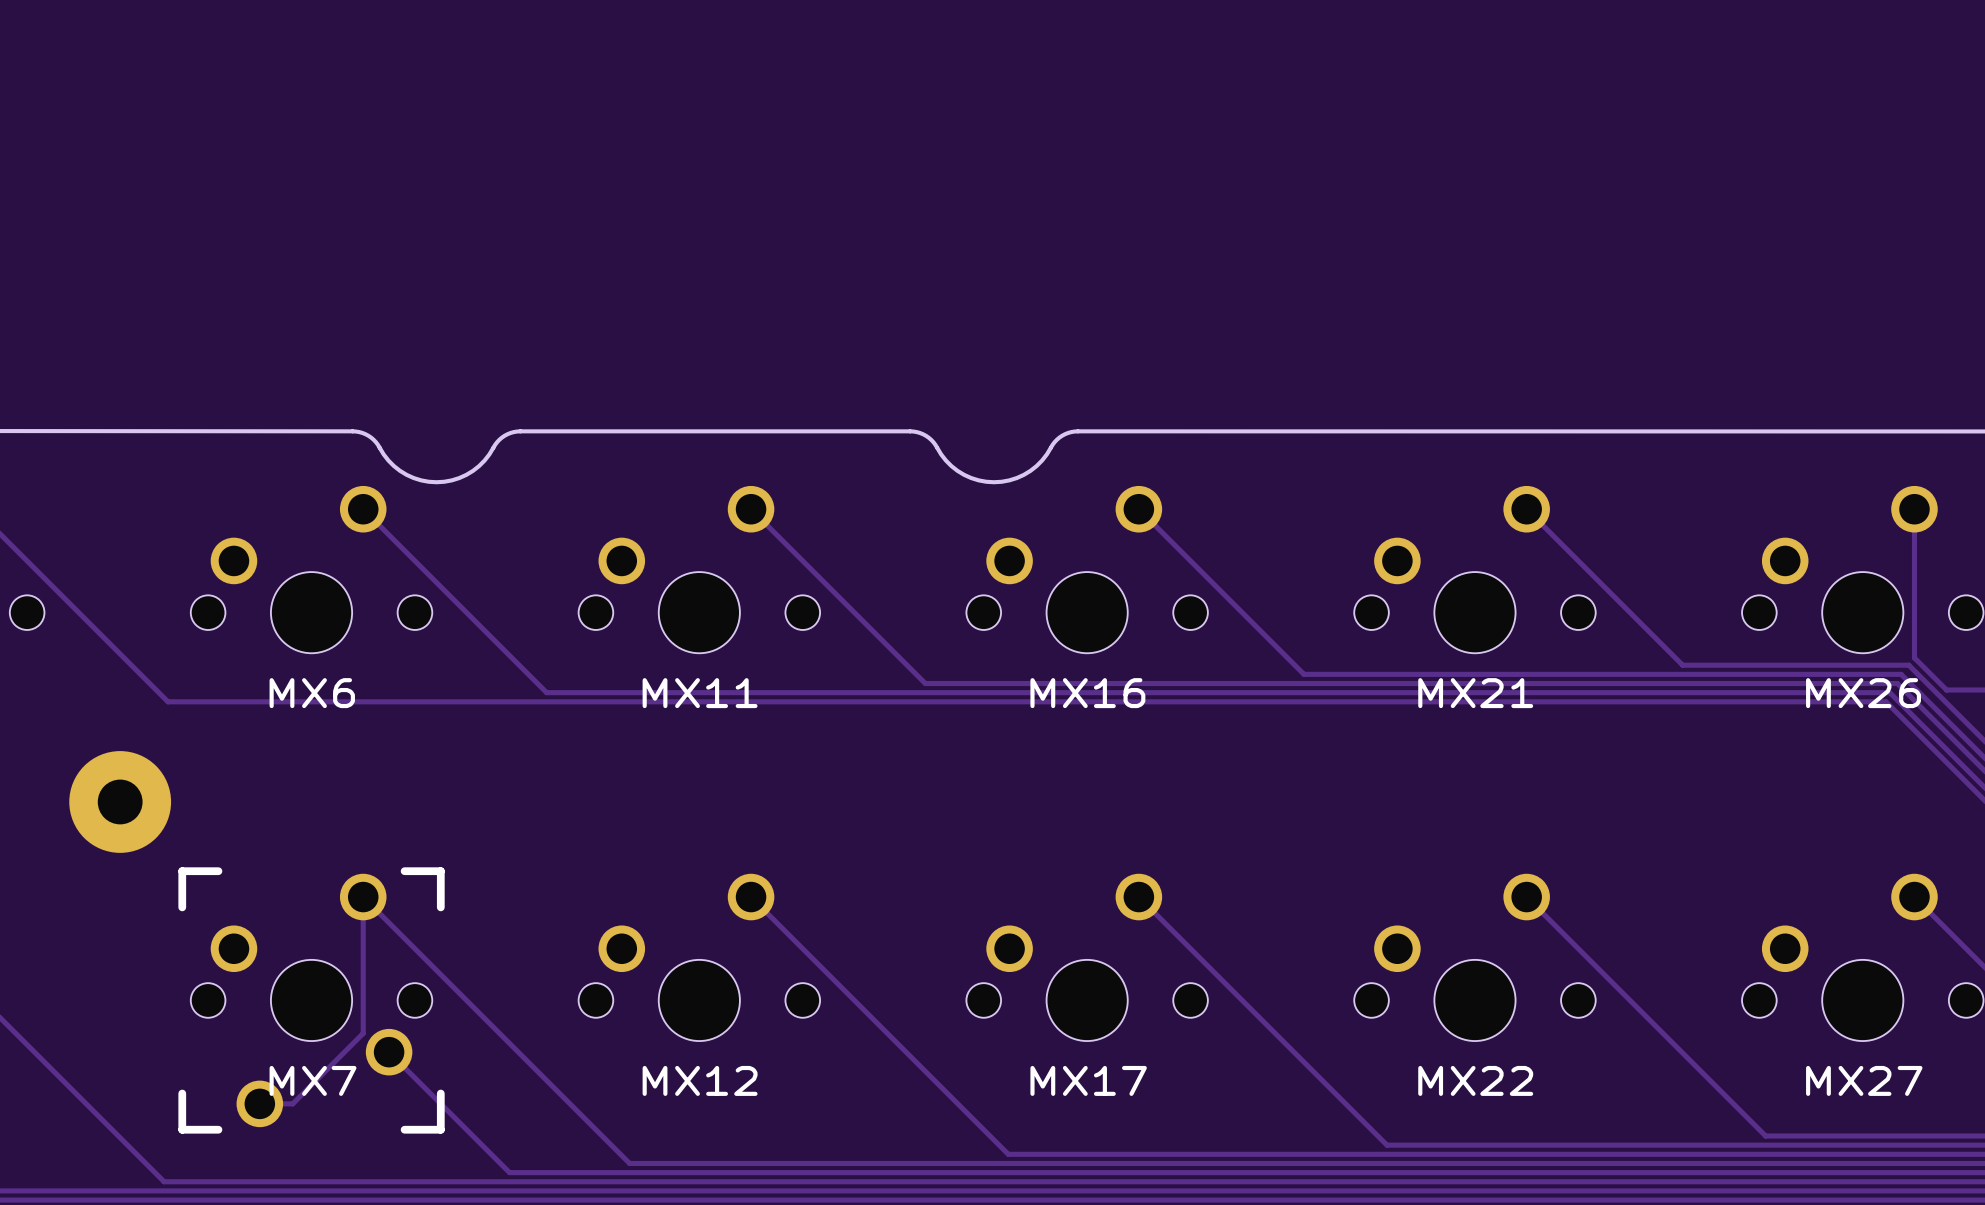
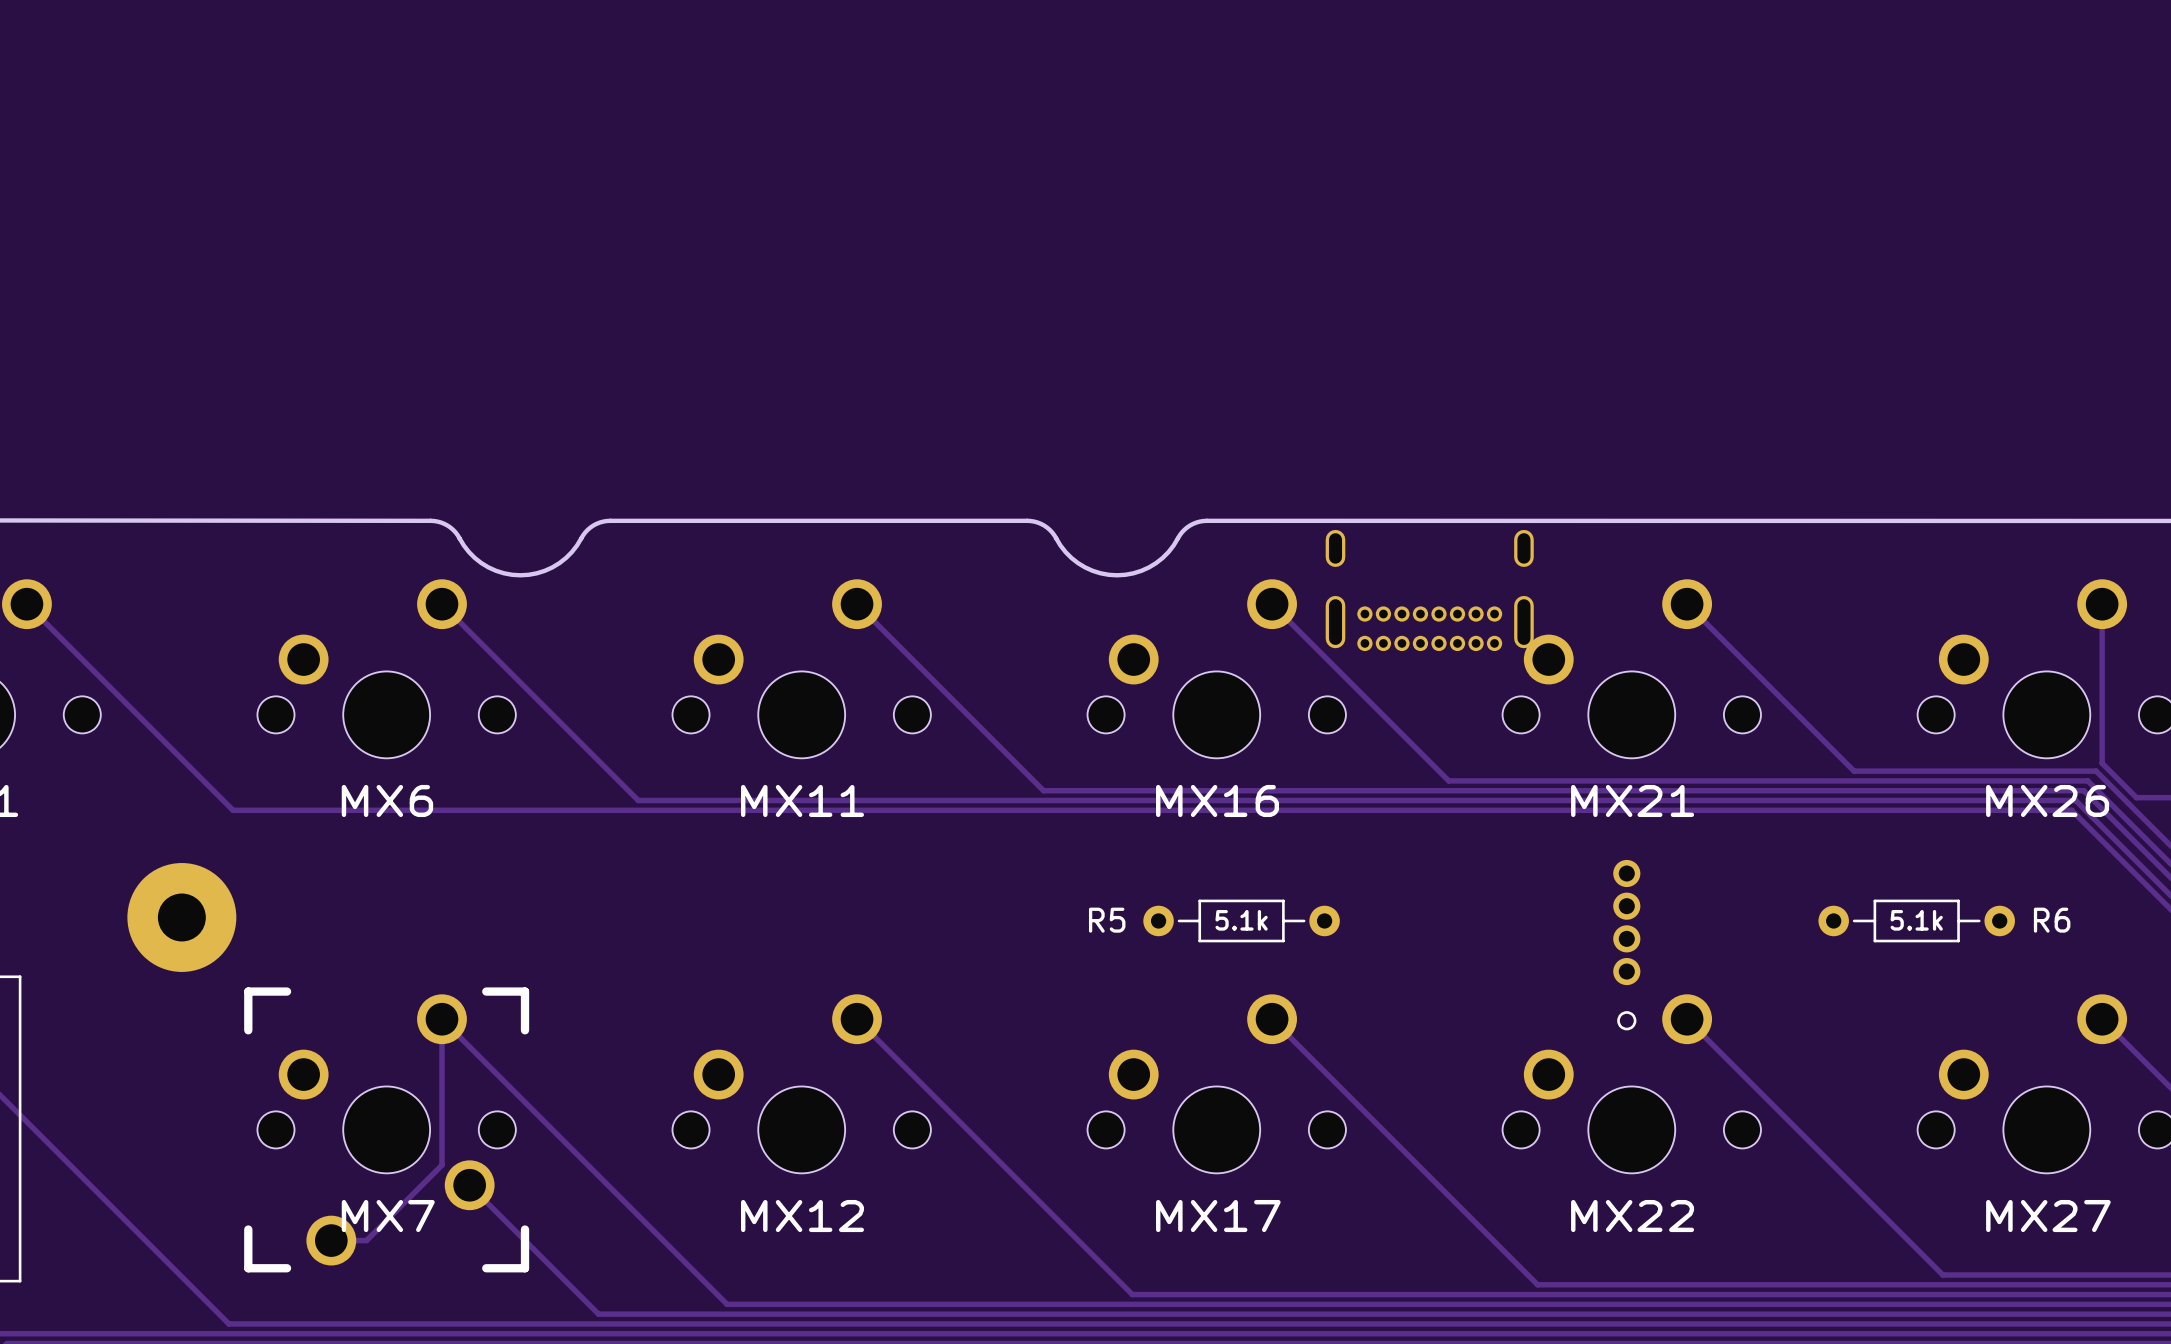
part: none -> (1429, 590)
R5: none -> 5.1k (1241, 920)
R6: none -> 5.1k (1916, 920)
part: none -> (1626, 945)

